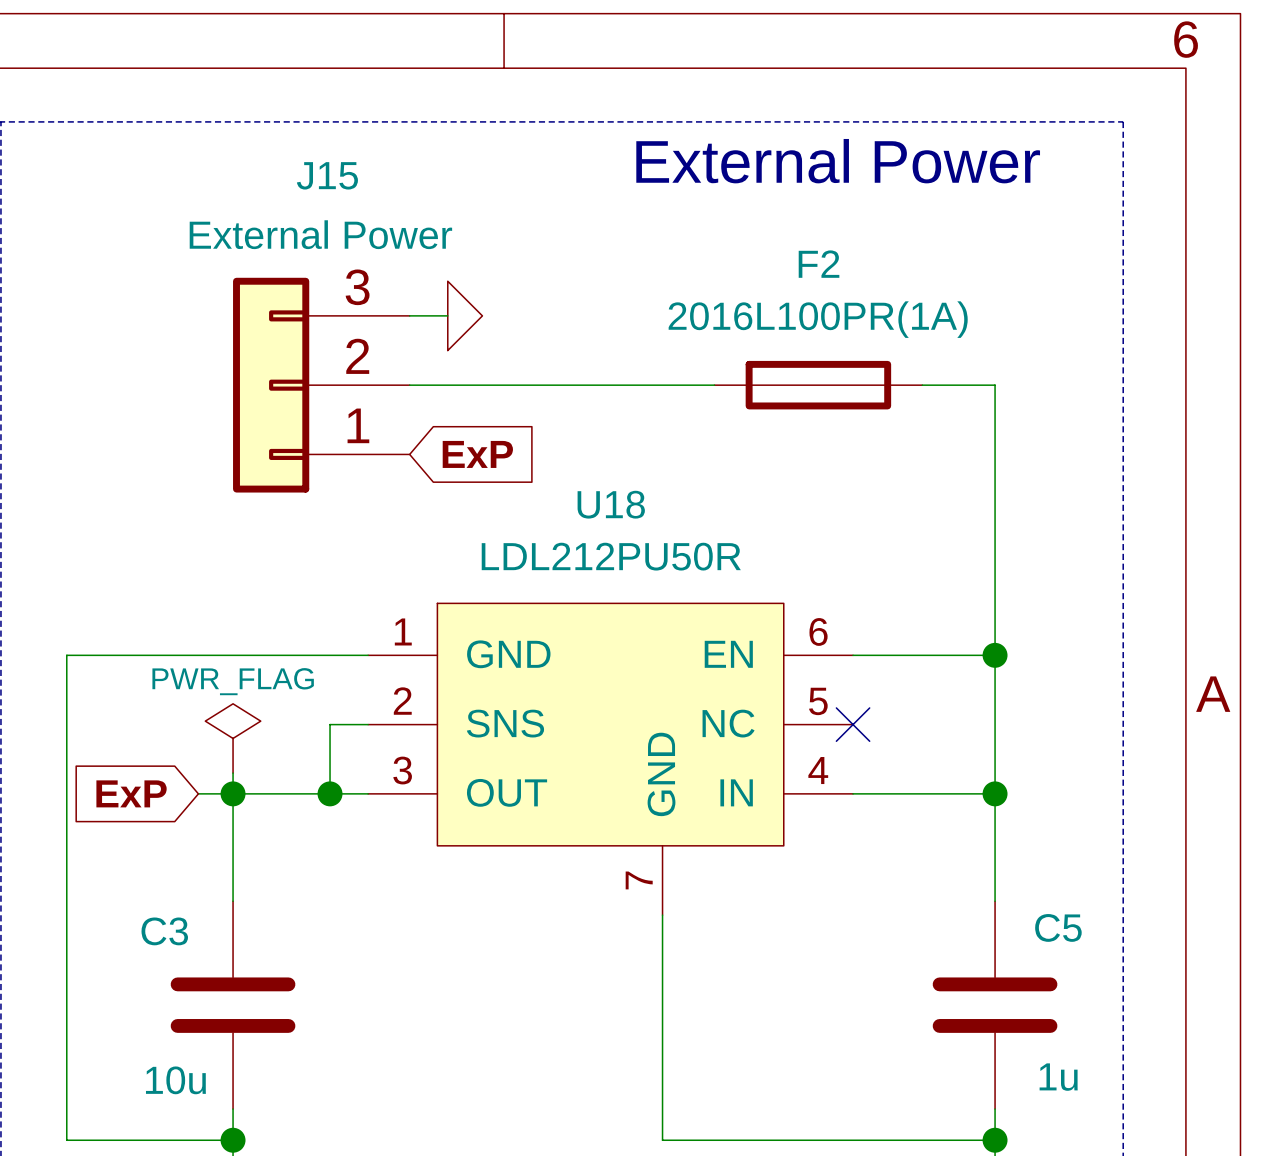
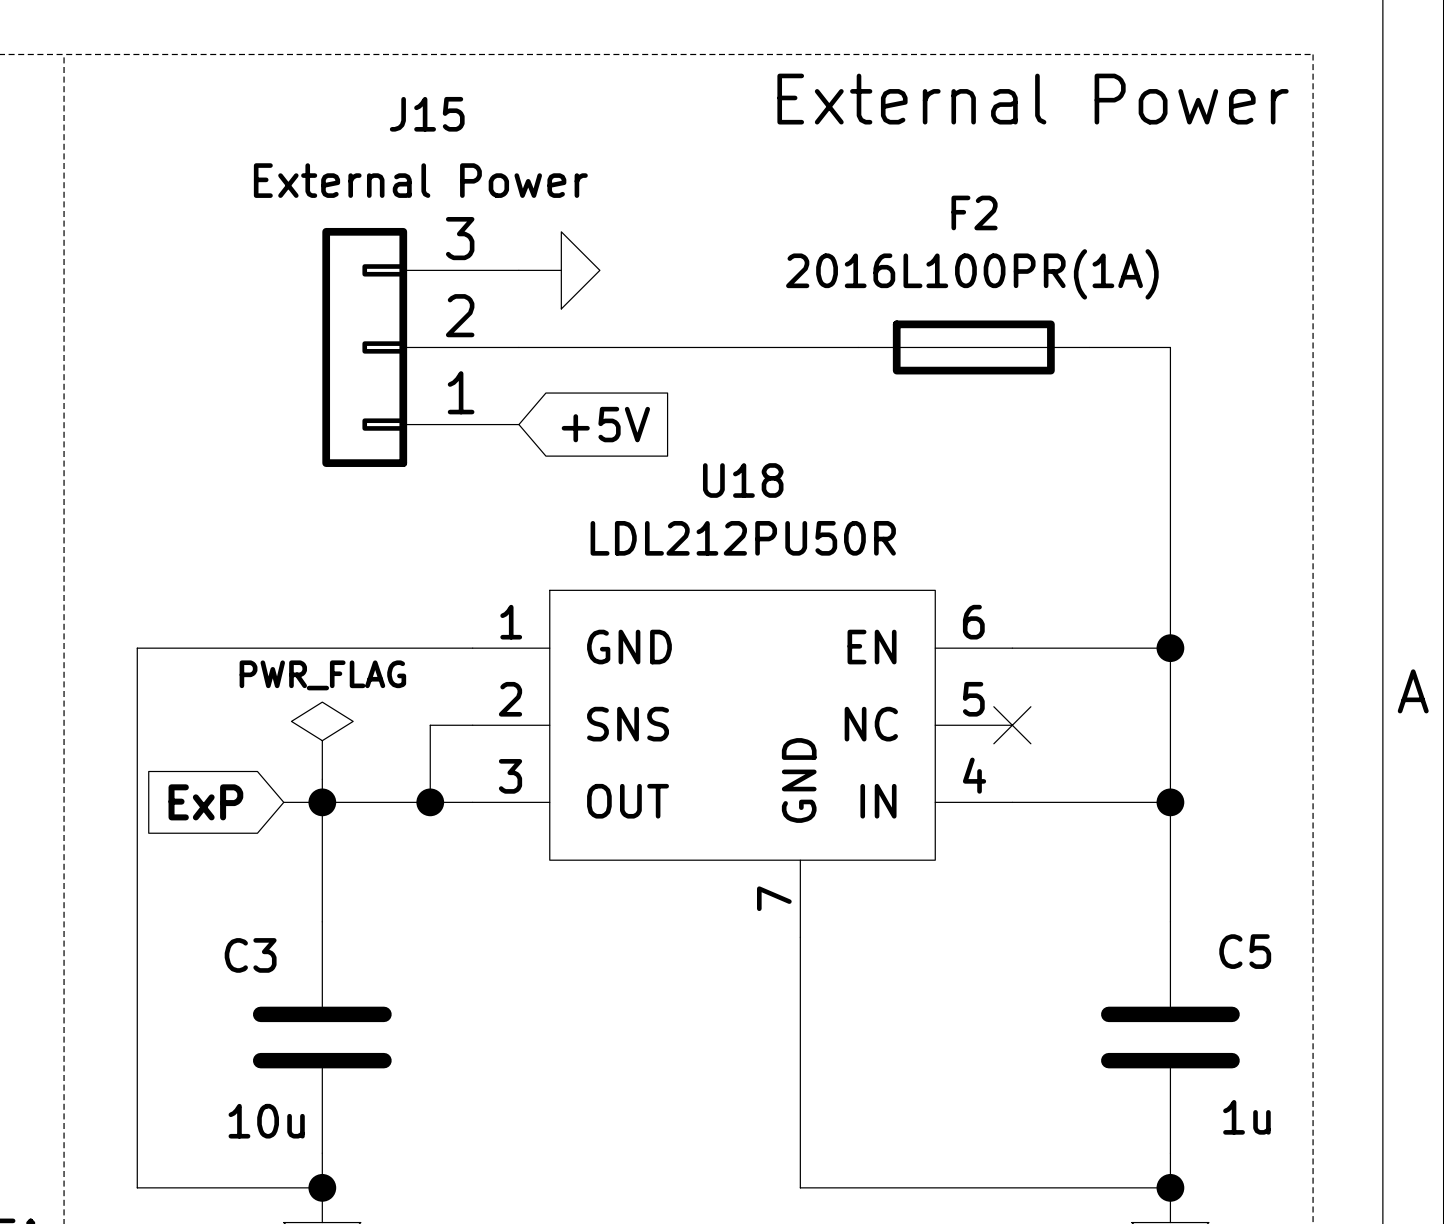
global label: ExP (477, 454) -> +5V (605, 424)

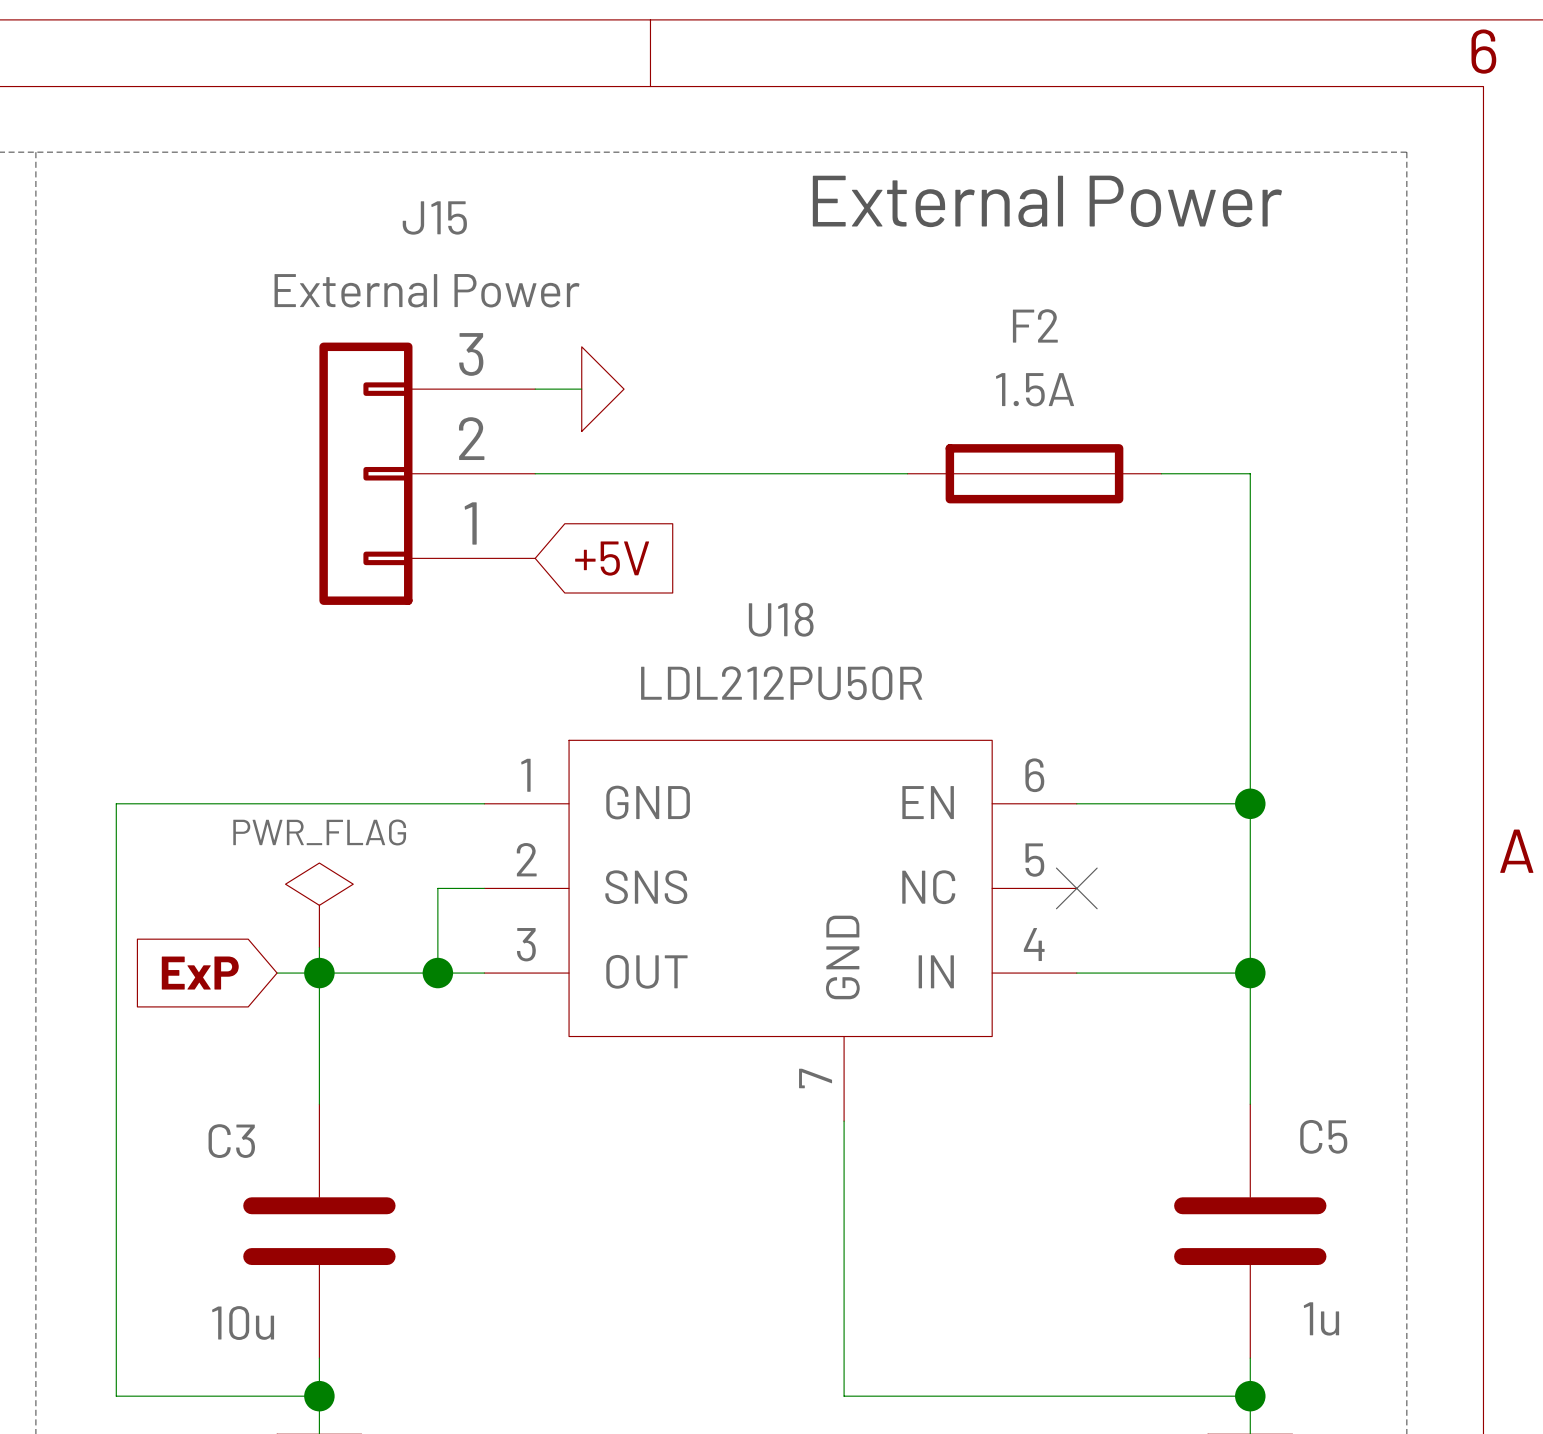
F2 value: 2016L100PR(1A) (972, 274) -> 1.5A (1035, 389)

